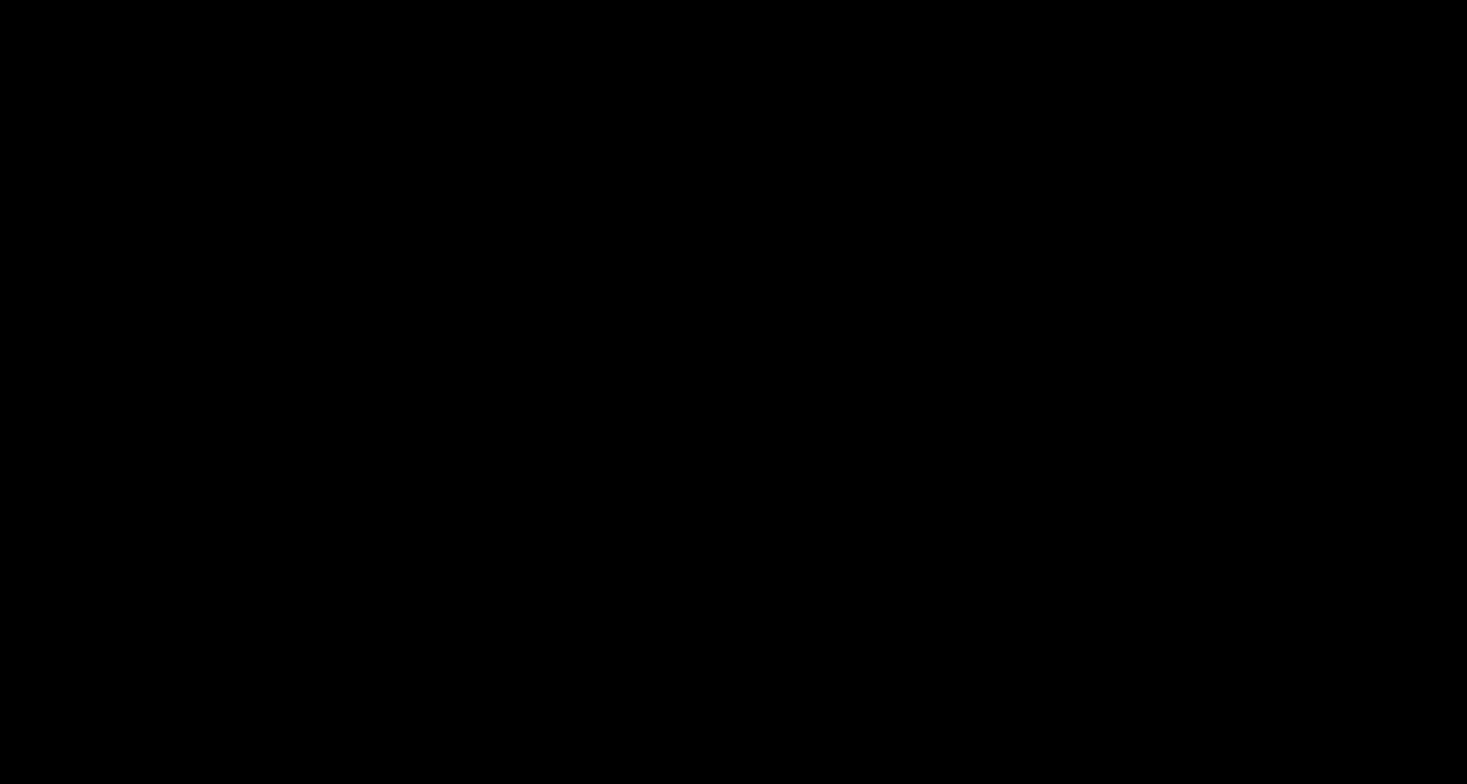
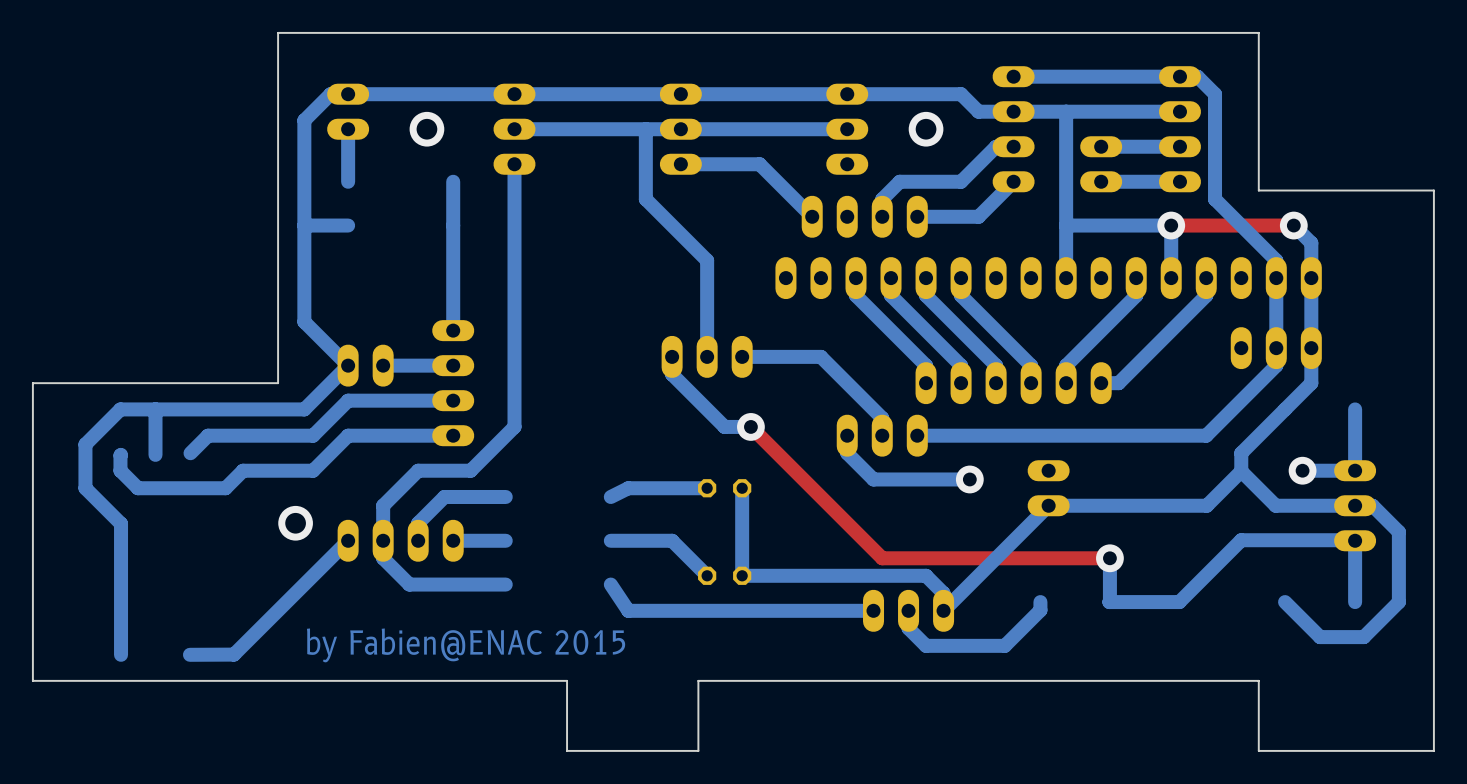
board edge: none -> (1258, 32) (1258, 190) (1433, 190) (1433, 750) (1258, 750) (1258, 680) (698, 680) (698, 750) (567, 750) (567, 680) (32, 680) (32, 383) (278, 383) (278, 32) (1258, 32)
bottom track: none -> (1013, 76) (1197, 76) (1215, 94) (1215, 199) (1276, 260) (1276, 365) (1206, 435) (917, 435)
part: none -> (348, 111)
bottom track: none -> (1066, 111) (1066, 278)
bottom track: none -> (1179, 111) (978, 111) (961, 94) (330, 94) (304, 120) (304, 321) (348, 365) (304, 409) (120, 409) (85, 444) (85, 488) (121, 523) (121, 654)
bottom track: none -> (348, 129) (348, 181)
via: none -> (426, 129)
part: none -> (514, 129)
bottom track: none -> (645, 129) (645, 199) (707, 260) (707, 356)
part: none -> (680, 129)
bottom track: none -> (847, 129) (514, 129)
part: none -> (847, 129)
via: none -> (926, 129)
part: none -> (1013, 129)
part: none -> (1179, 129)
bottom track: none -> (1013, 146) (996, 146) (961, 181) (899, 181) (882, 199) (882, 216)
bottom track: none -> (1179, 146) (1101, 146)
bottom track: none -> (514, 164) (514, 426) (470, 470) (418, 470) (383, 505) (383, 558) (409, 584) (505, 584)
bottom track: none -> (680, 164) (759, 164) (812, 216)
part: none -> (1101, 164)
bottom track: none -> (453, 181) (453, 330)
bottom track: none -> (1013, 181) (978, 216) (917, 216)
bottom track: none -> (1179, 181) (1101, 181)
part: none -> (864, 216)
bottom track: none -> (348, 225) (304, 225)
bottom track: none -> (1066, 225) (1171, 225) (1171, 278)
via: none -> (1171, 225)
bottom track: none -> (1293, 225) (1311, 243) (1311, 383) (1241, 453) (1241, 471)
top track: none -> (1293, 225) (1171, 225)
via: none -> (1293, 225)
bottom track: none -> (856, 278) (856, 295) (926, 365) (926, 383)
bottom track: none -> (891, 278) (891, 295) (961, 365) (961, 383)
bottom track: none -> (926, 278) (926, 295) (996, 365) (996, 383)
bottom track: none -> (961, 278) (961, 295) (1031, 365) (1031, 383)
part: none -> (1048, 278)
bottom track: none -> (1136, 278) (1136, 295) (1066, 365) (1066, 383)
bottom track: none -> (1206, 278) (1206, 295) (1118, 383) (1101, 383)
part: none -> (1276, 348)
bottom track: none -> (672, 356) (672, 374) (724, 426) (750, 426)
part: none -> (707, 356)
bottom track: none -> (742, 356) (820, 356) (882, 418) (882, 435)
part: none -> (365, 365)
bottom track: none -> (453, 365) (383, 365)
part: none -> (453, 383)
part: none -> (1013, 383)
bottom track: none -> (453, 400) (348, 400) (313, 435) (208, 435) (190, 453)
bottom track: none -> (155, 409) (155, 454)
bottom track: none -> (1355, 409) (1355, 470) (1302, 470)
top track: none -> (750, 426) (882, 558) (1109, 558)
via: none -> (750, 426)
bottom track: none -> (453, 435) (348, 435) (313, 470) (243, 470) (225, 488) (137, 488) (120, 470) (121, 454)
bottom track: none -> (847, 435) (847, 453) (873, 479) (969, 479)
part: none -> (882, 435)
via: none -> (1302, 470)
bottom track: none -> (1241, 471) (1275, 505) (1372, 505) (1398, 532) (1398, 602) (1363, 637) (1320, 637) (1285, 602)
bottom track: none -> (1241, 471) (1206, 505) (1048, 505) (943, 610) (943, 593) (926, 575) (742, 575) (742, 488)
via: none -> (969, 479)
bottom track: none -> (707, 488) (628, 488) (610, 496)
part: none -> (724, 488)
part: none -> (1048, 488)
bottom track: none -> (505, 496) (444, 496) (418, 523) (418, 540)
part: none -> (1355, 505)
via: none -> (295, 523)
bottom track: none -> (348, 540) (233, 654) (189, 654)
part: none -> (400, 540)
bottom track: none -> (505, 540) (453, 540)
bottom track: none -> (610, 540) (672, 540) (707, 575)
bottom track: none -> (1109, 558) (1109, 602) (1179, 602) (1241, 540) (1354, 540) (1355, 602)
via: none -> (1109, 558)
part: none -> (724, 575)
bottom track: none -> (610, 584) (628, 610) (873, 610)
bottom track: none -> (1040, 602) (1040, 610) (1004, 645) (926, 645) (908, 628) (908, 610)
part: none -> (908, 610)
text: none -> by Fabien@ENAC 2015 (466, 645)

